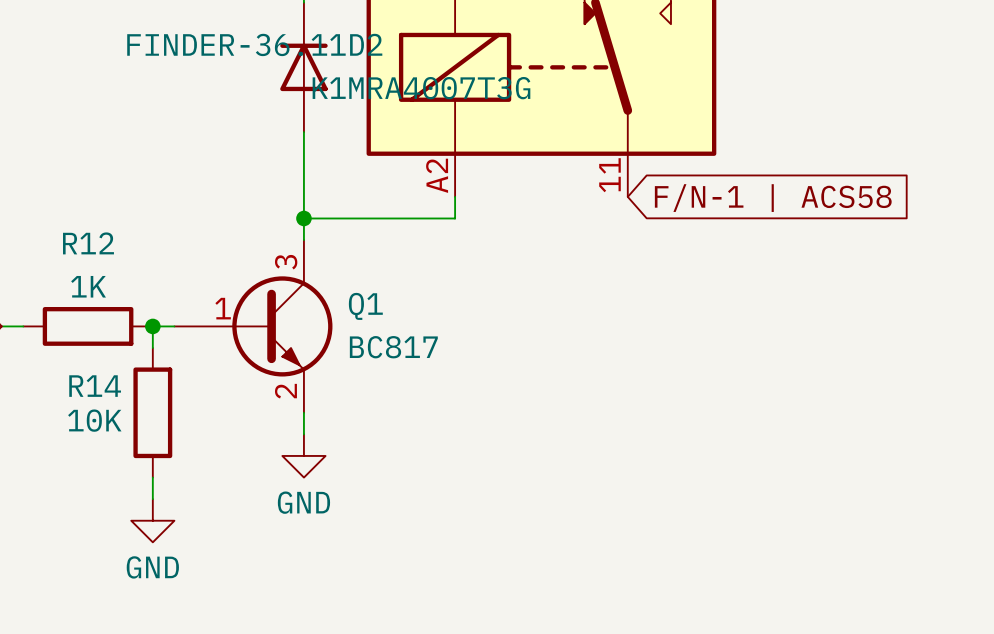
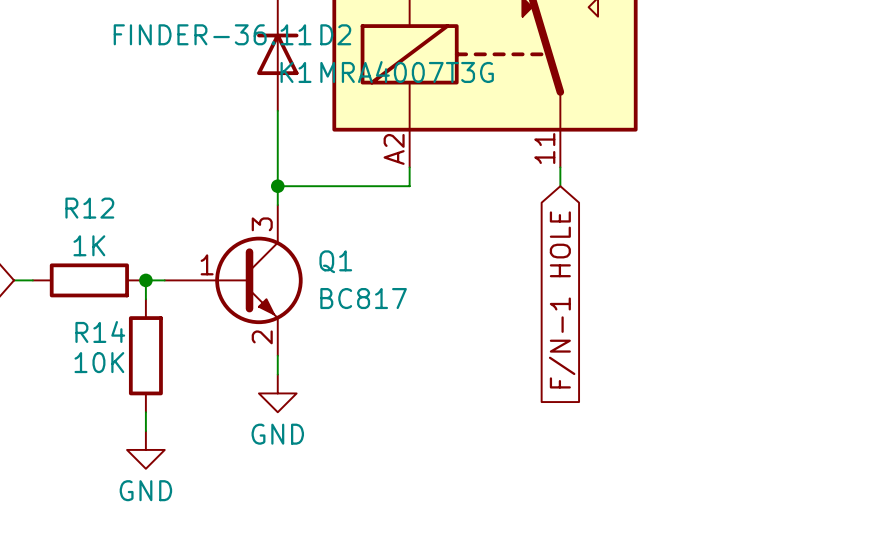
wire: none -> (560, 167) (560, 186)
global label: F/N-1 | ACS58 (773, 198) -> none
global label: none -> F/N-1 HOLE (562, 299)

